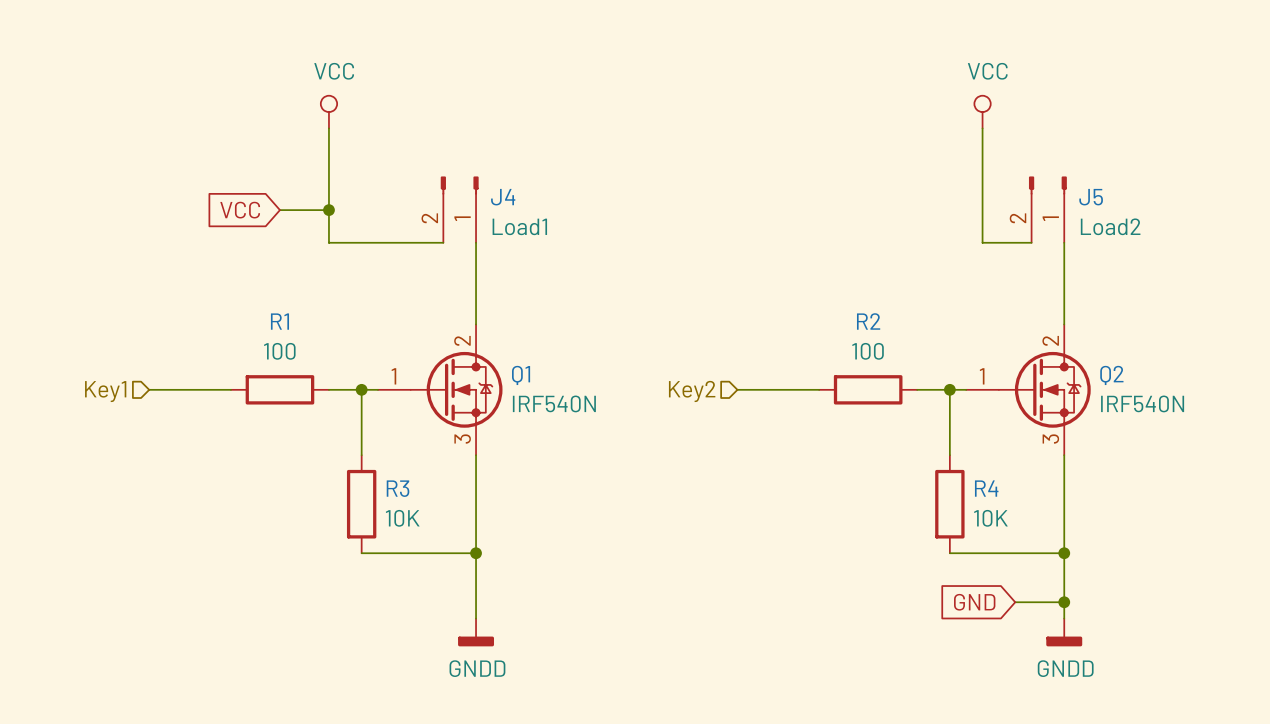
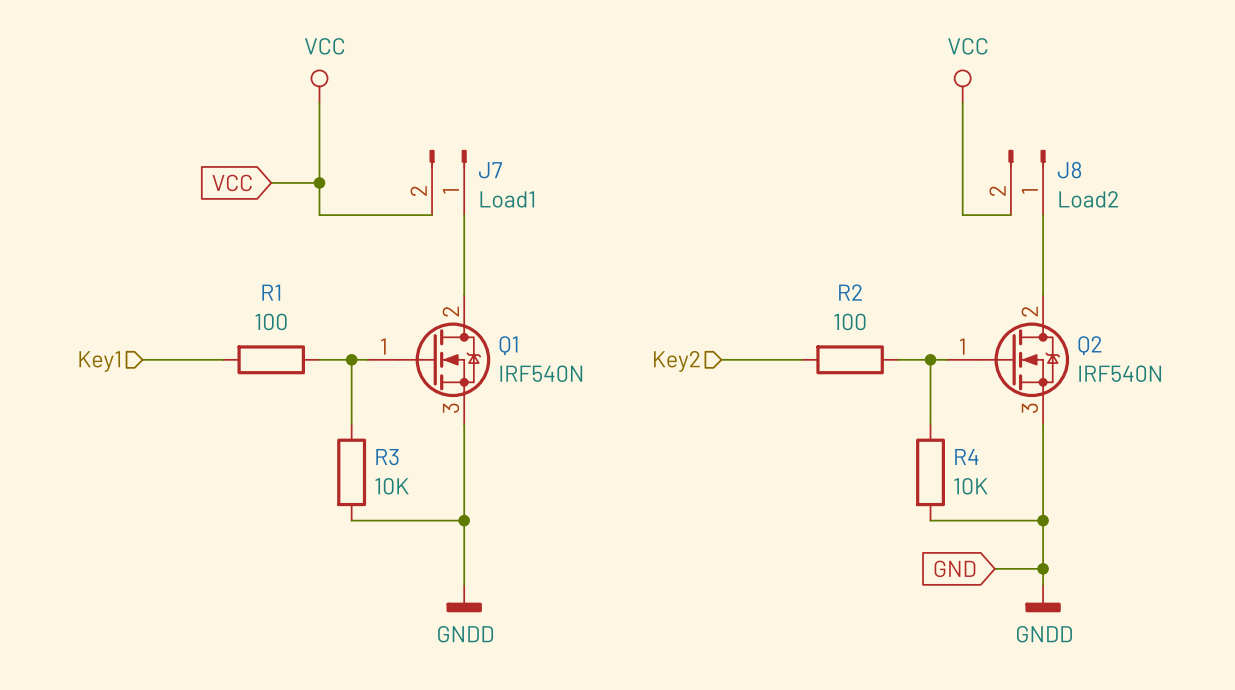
J4 name: J4 (503, 197) -> J7 (490, 170)
J5 name: J5 (1091, 197) -> J8 (1069, 170)

